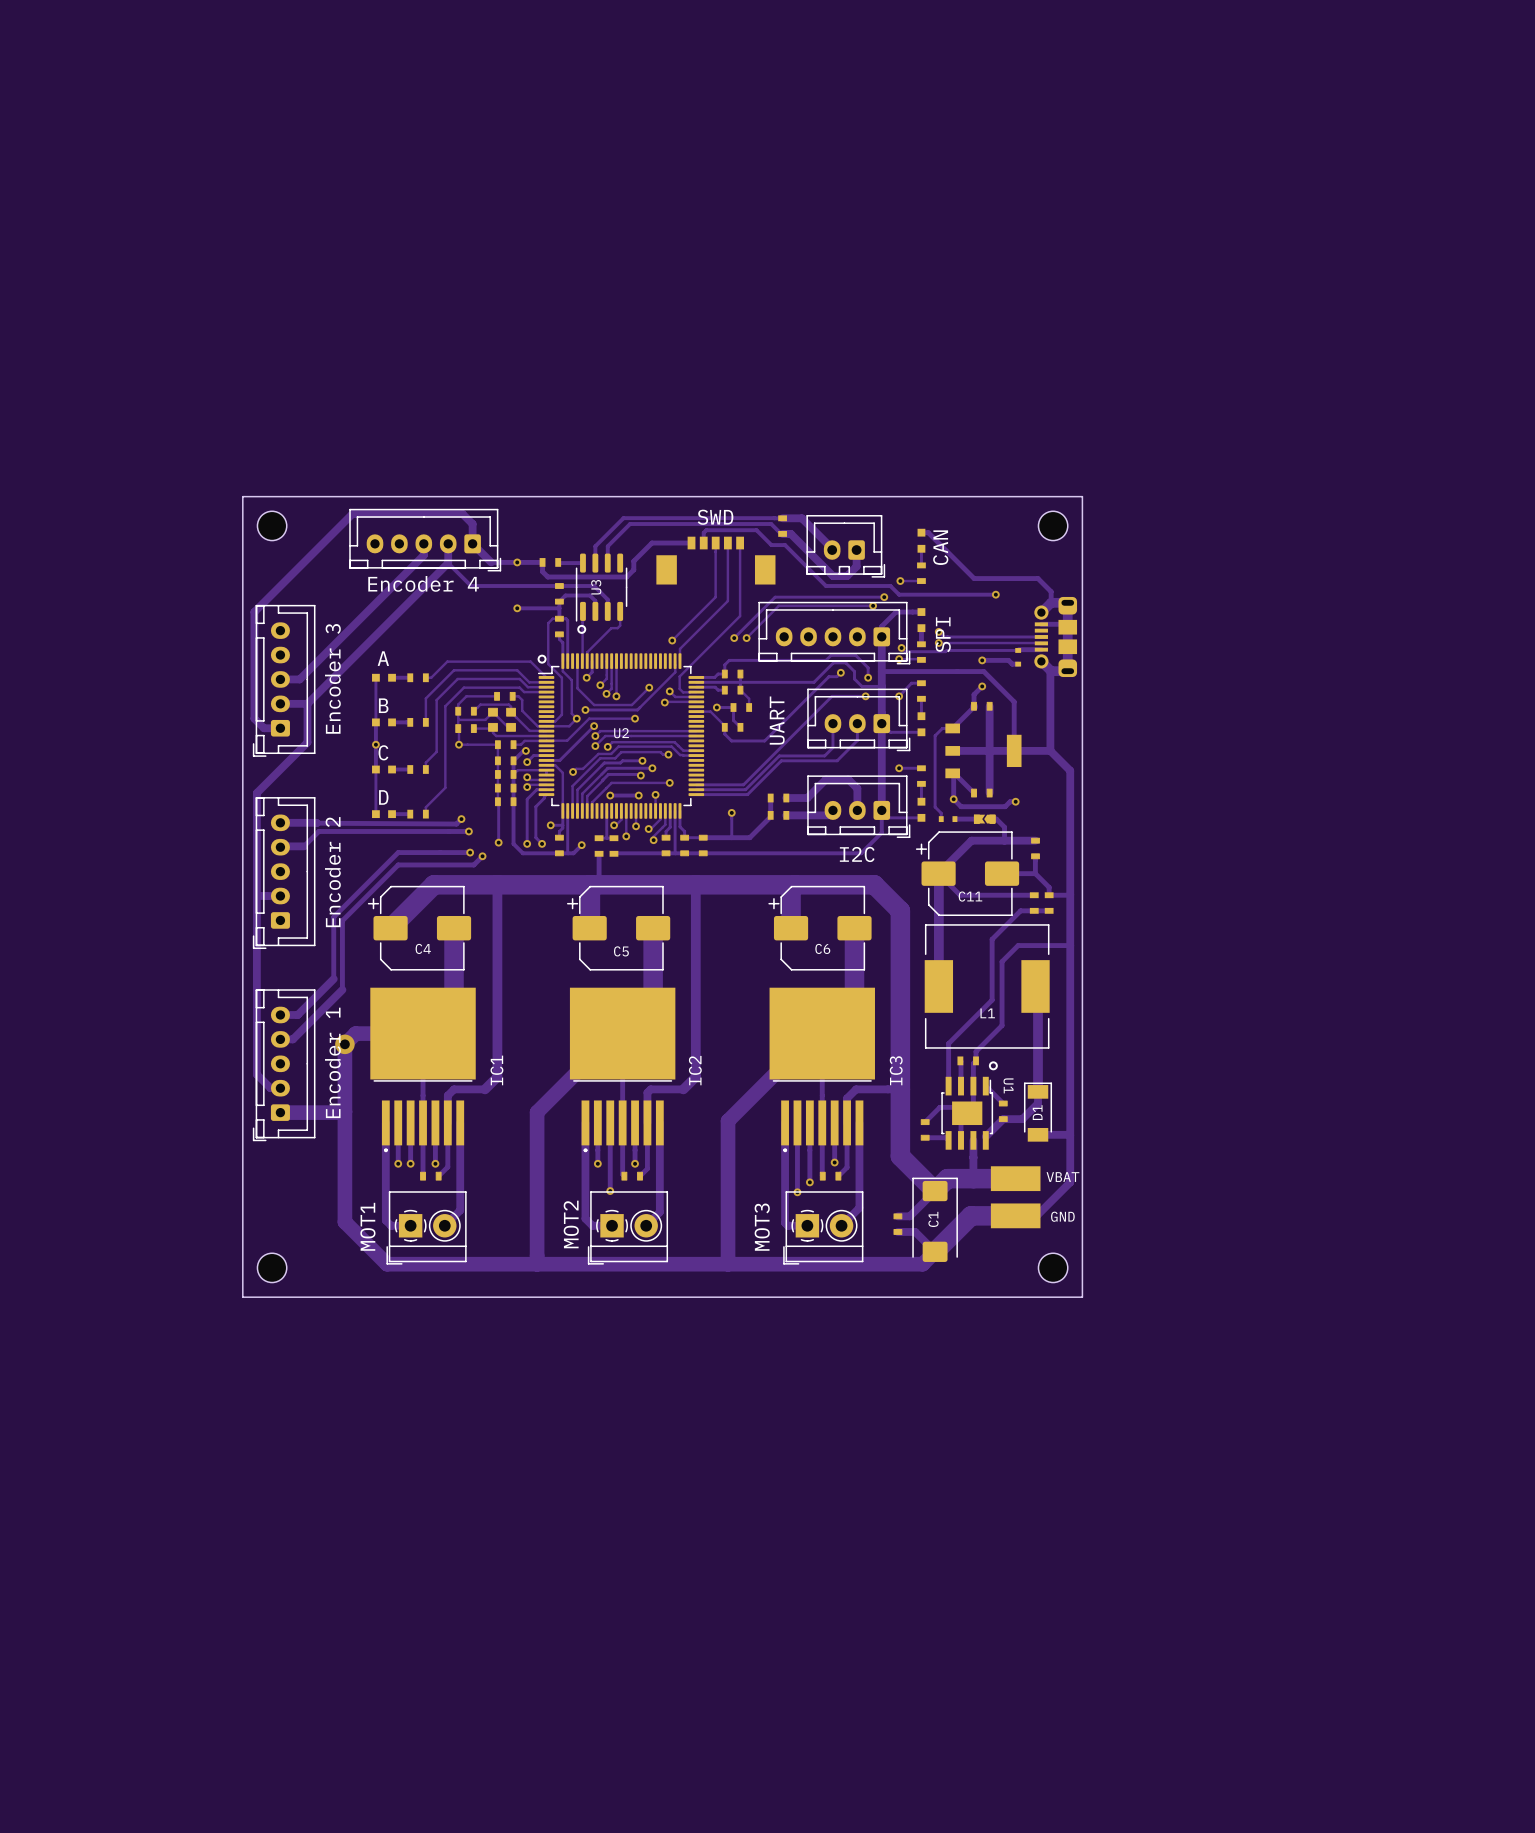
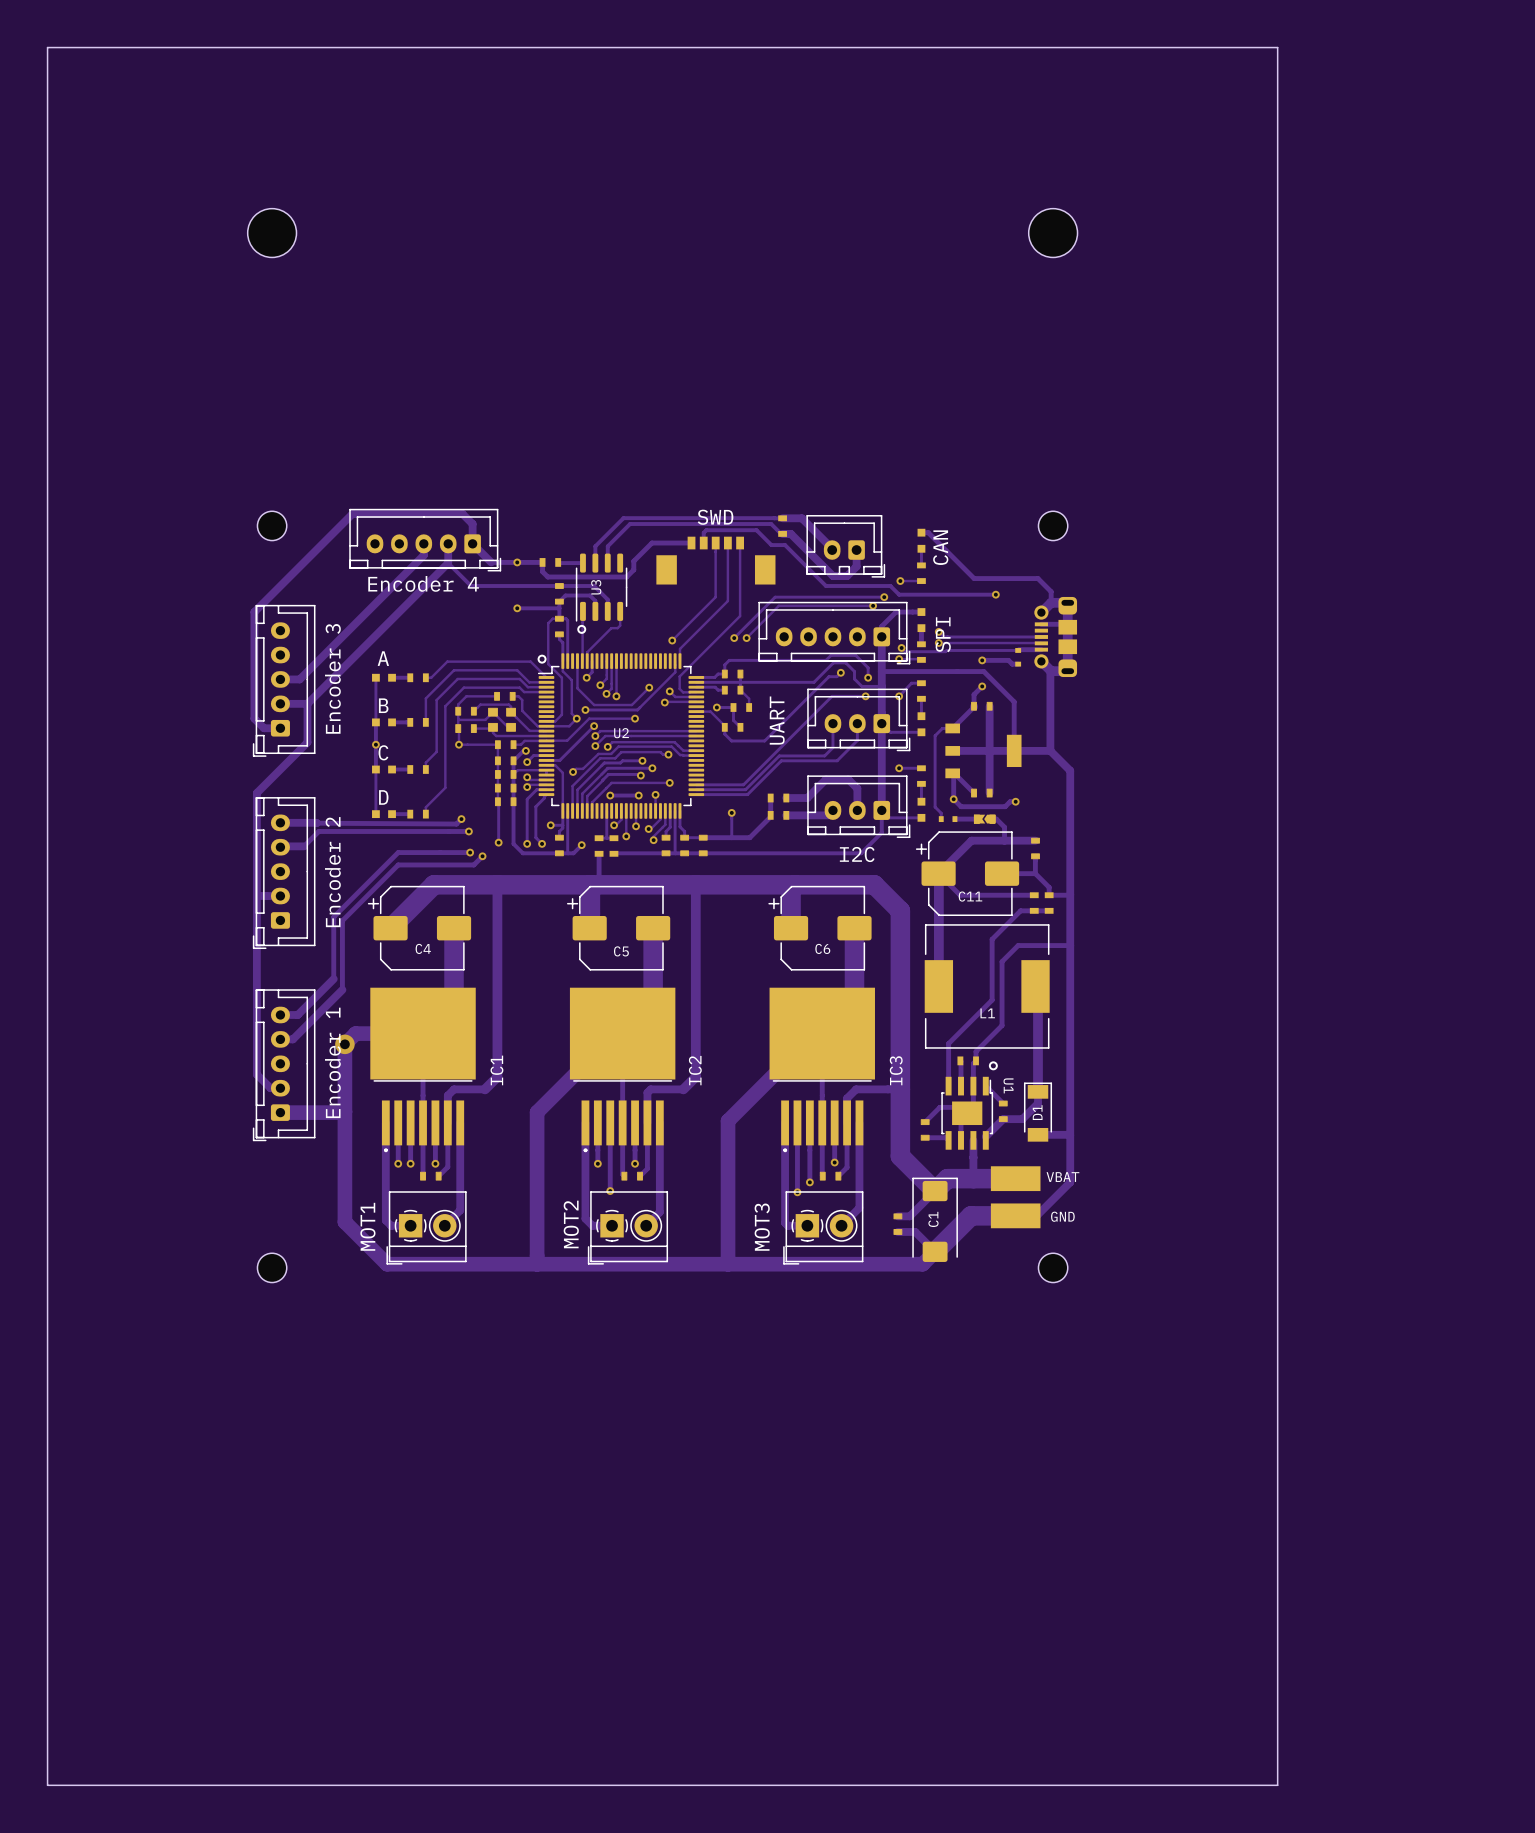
board edge: none -> (47, 47) (1277, 47) (1277, 1785) (47, 1785) (47, 47)
part: none -> (272, 233)
part: none -> (1053, 233)
board edge: (242, 496) (1082, 496) (1082, 1297) (242, 1297) (242, 496) -> none

